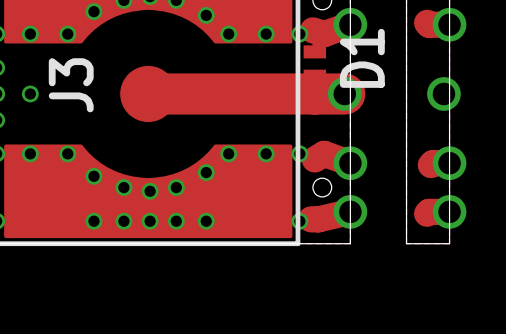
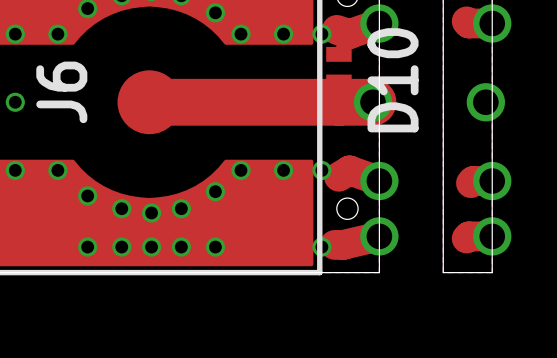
D1 name: D1 (362, 58) -> D10 (393, 80)
J3 name: J3 (71, 85) -> J6 (61, 92)

